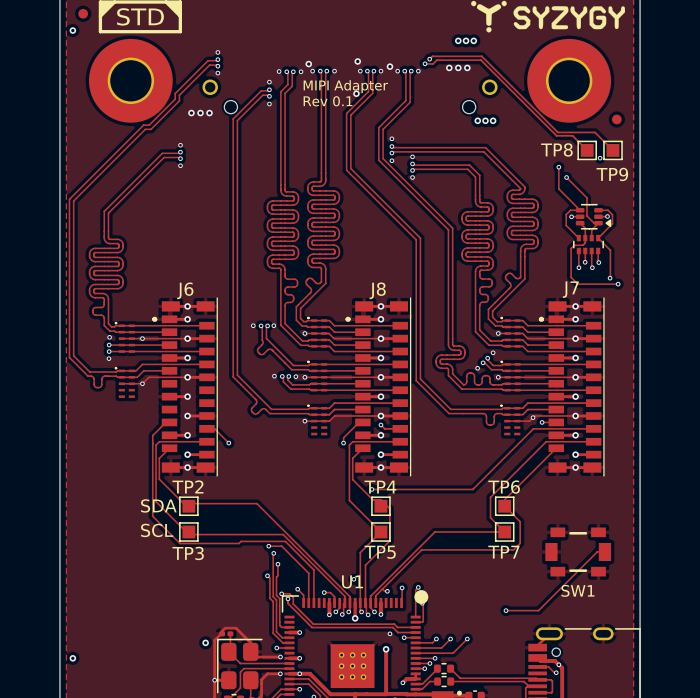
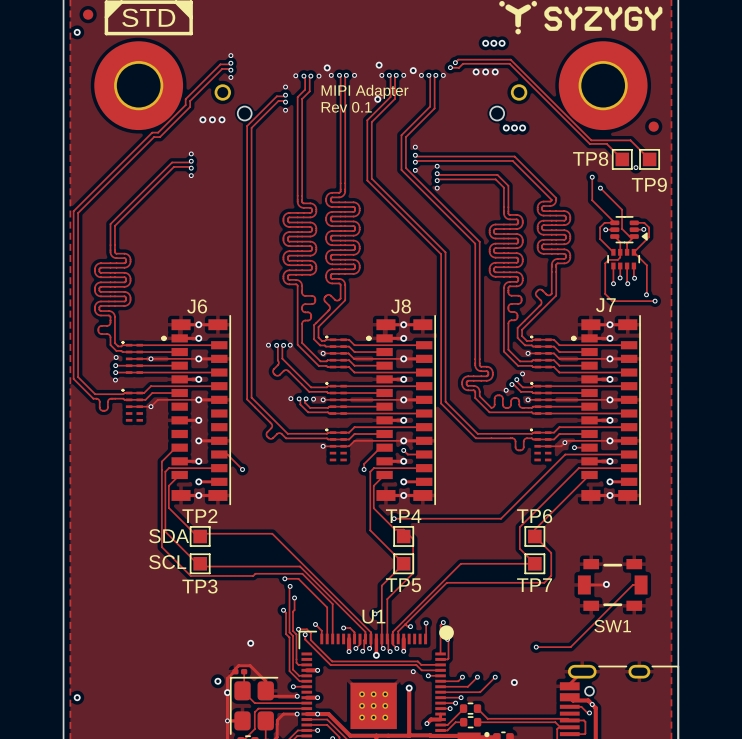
track: none -> (606, 584) (584, 584)
via: none -> (606, 584)
via: none -> (250, 643)
via: none -> (514, 682)
via: none -> (227, 692)

